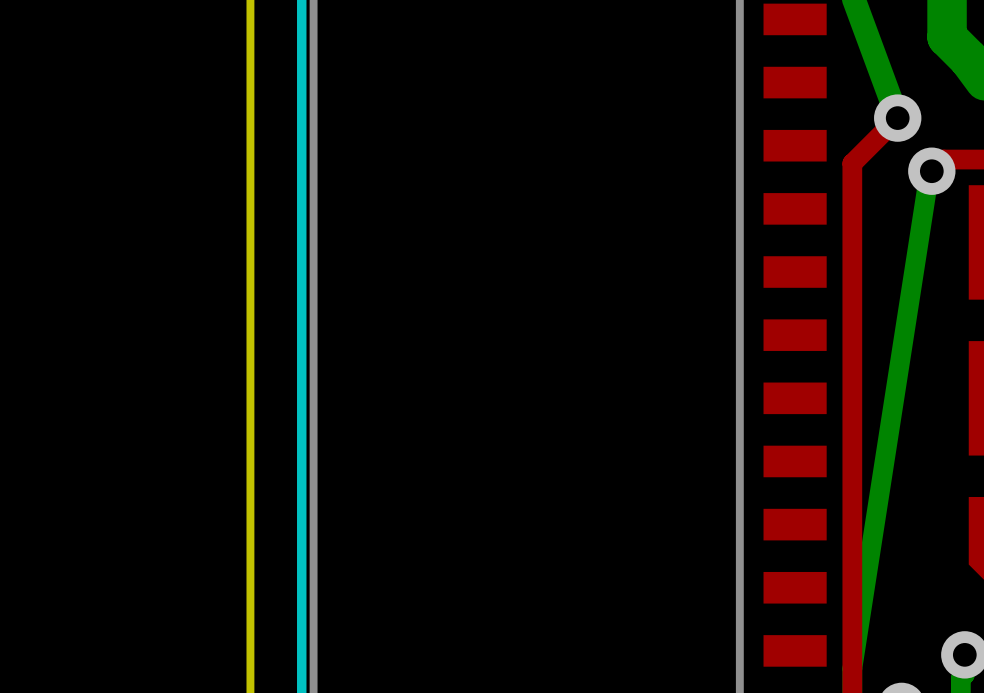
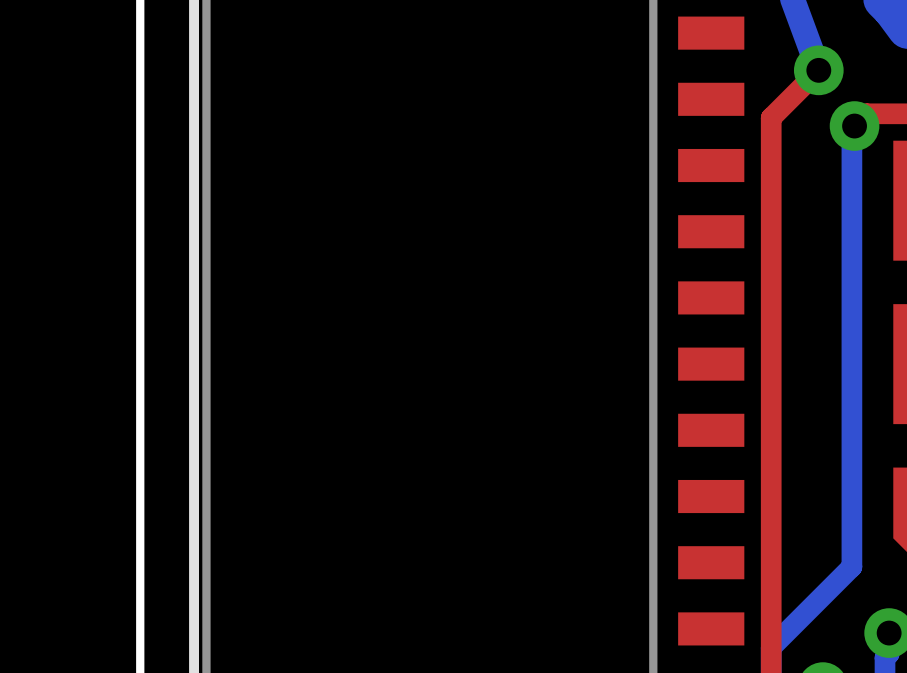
bottom track: (929, 173) (852, 668) -> (851, 128) (851, 566) (771, 647)

